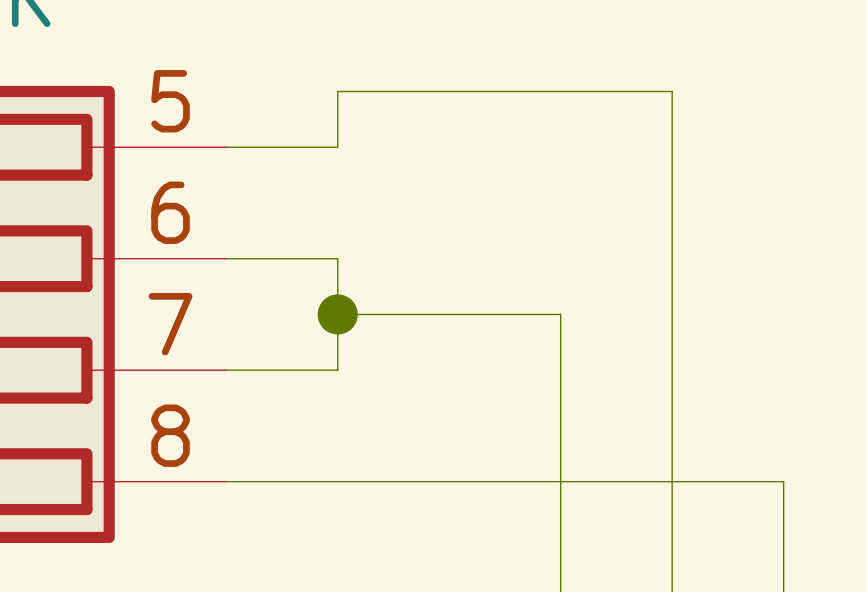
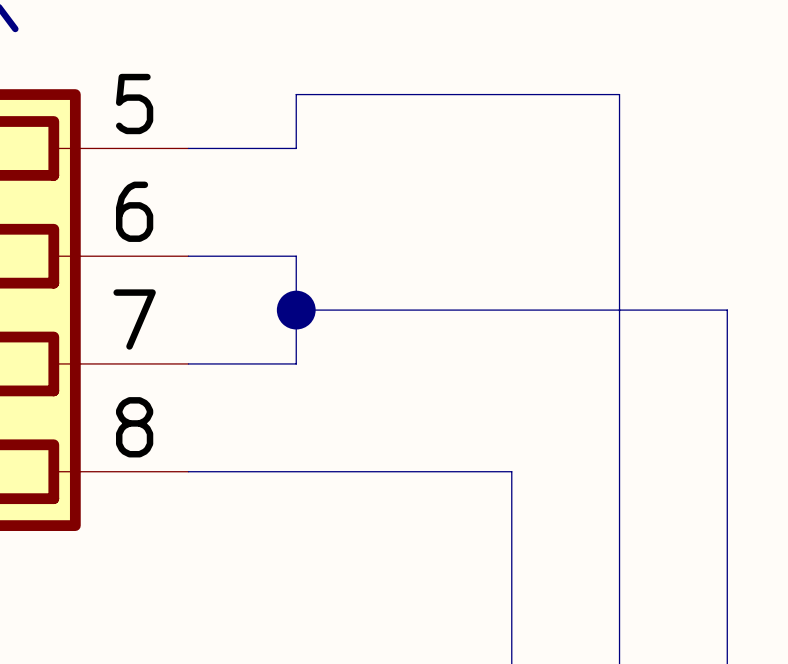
wire: (560, 314) (560, 481) (783, 481) -> (511, 310) (727, 310) (727, 471)

